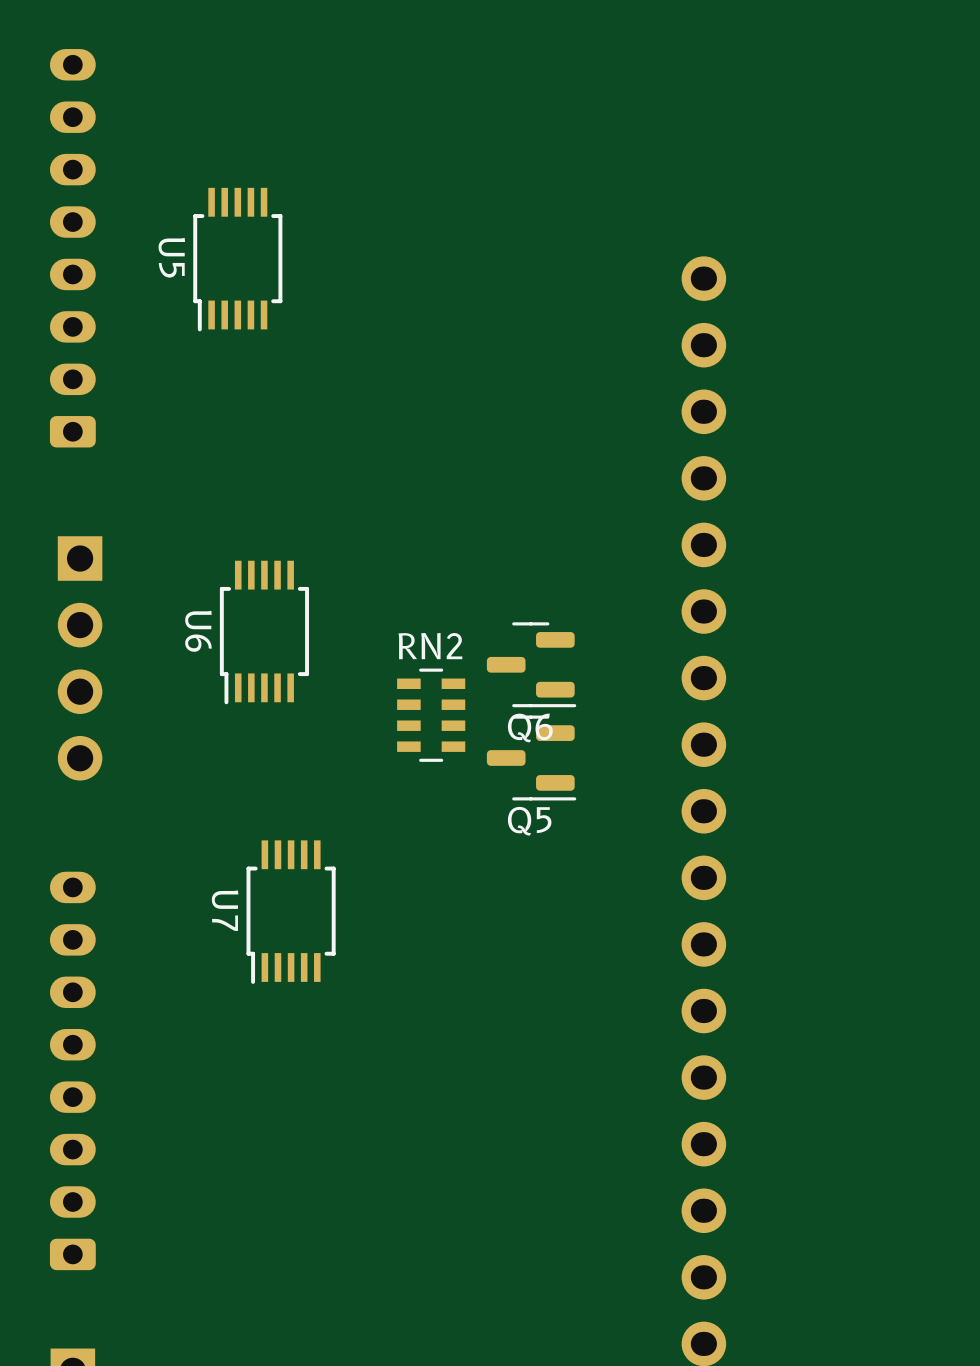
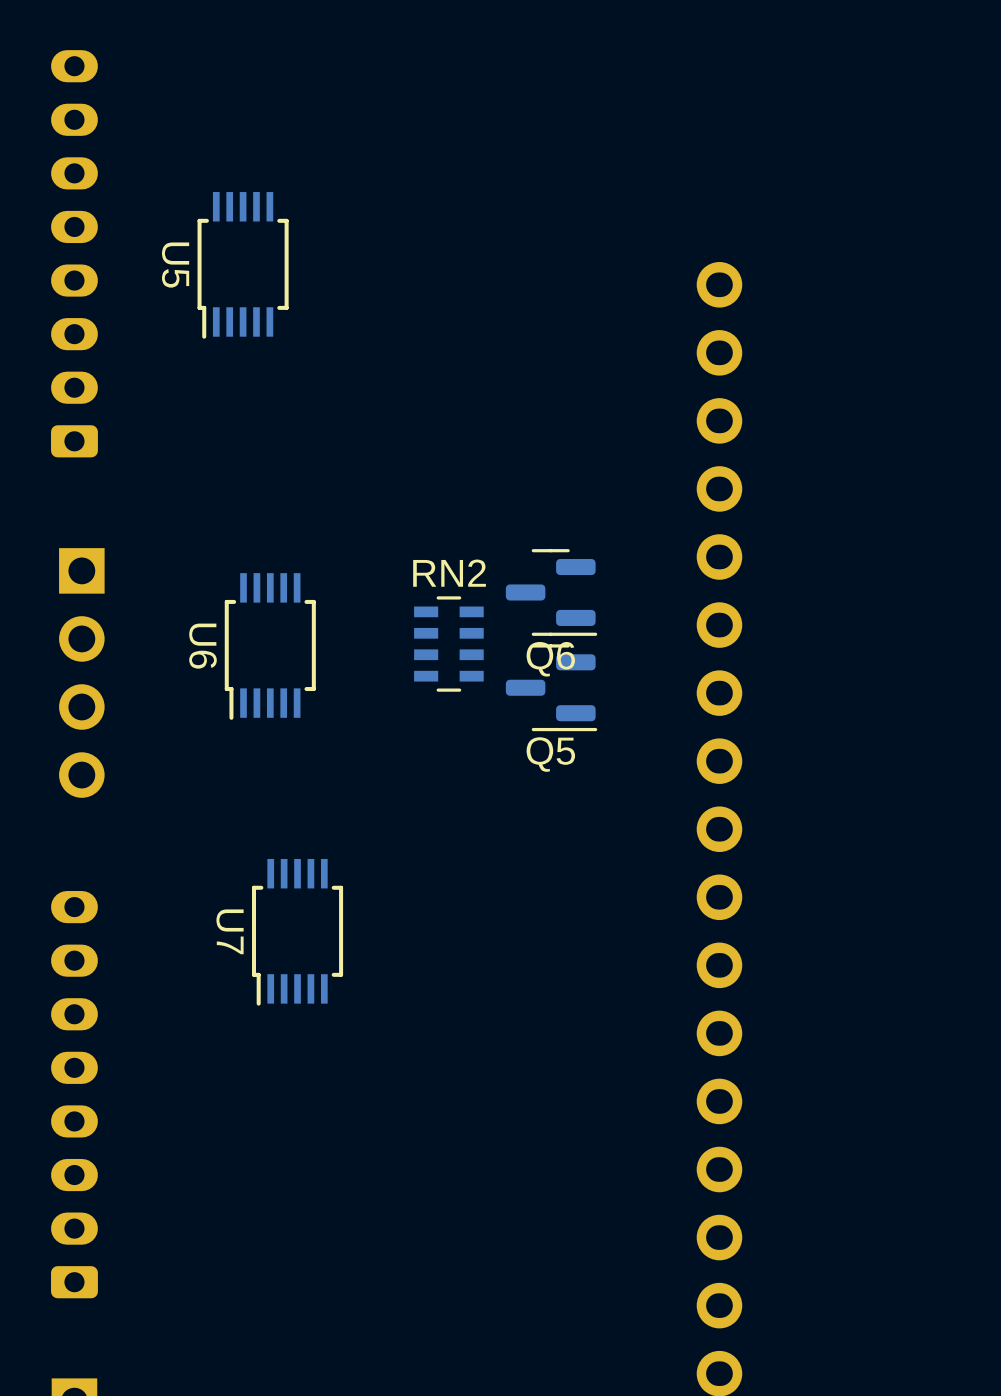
Q6 position: (531, 664) -> (551, 592)
RN2 position: (431, 715) -> (448, 644)
Q5 position: (531, 758) -> (551, 687)

